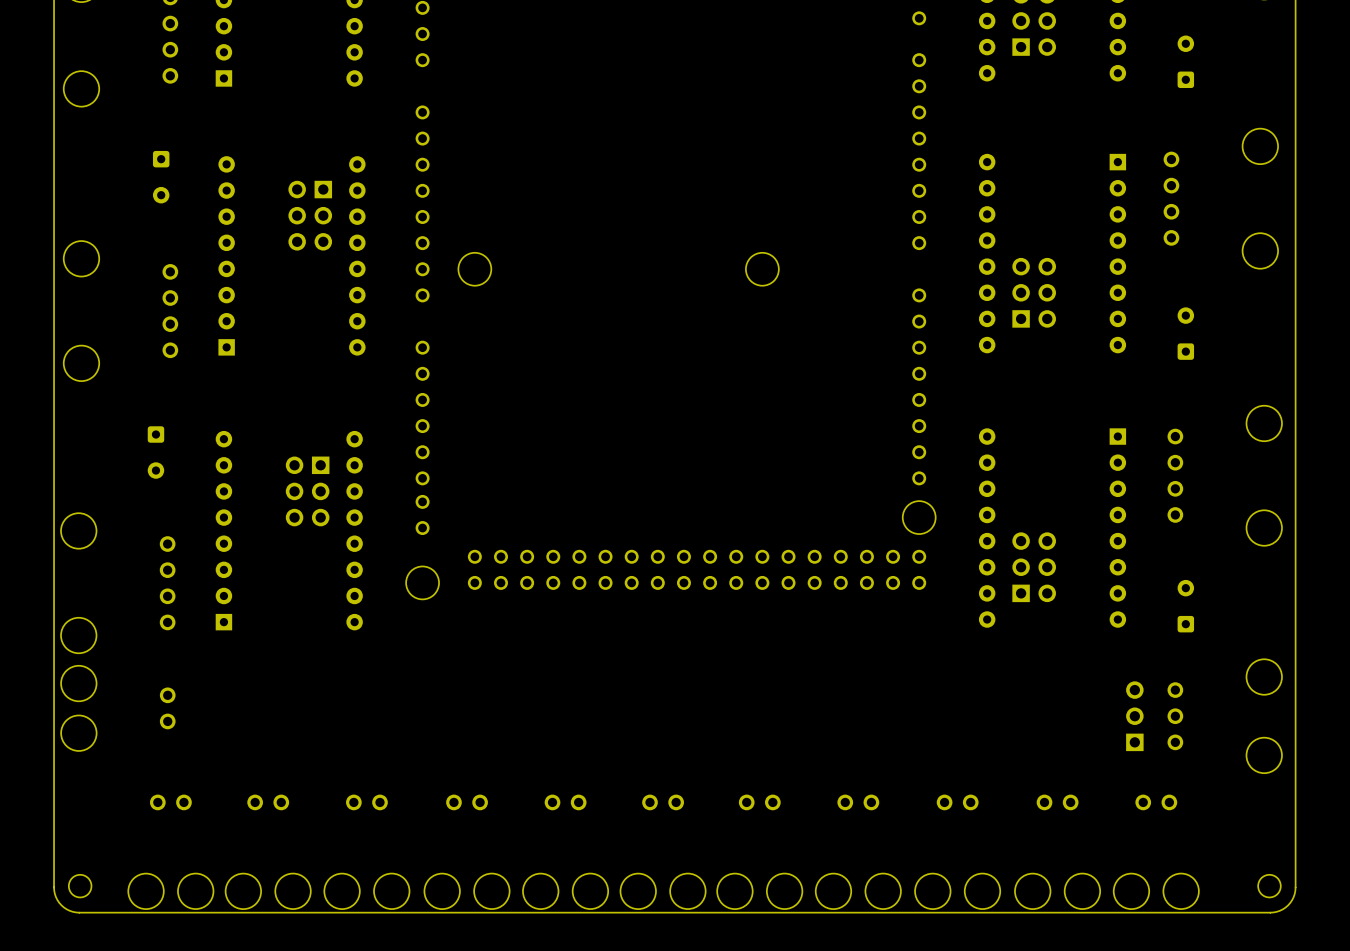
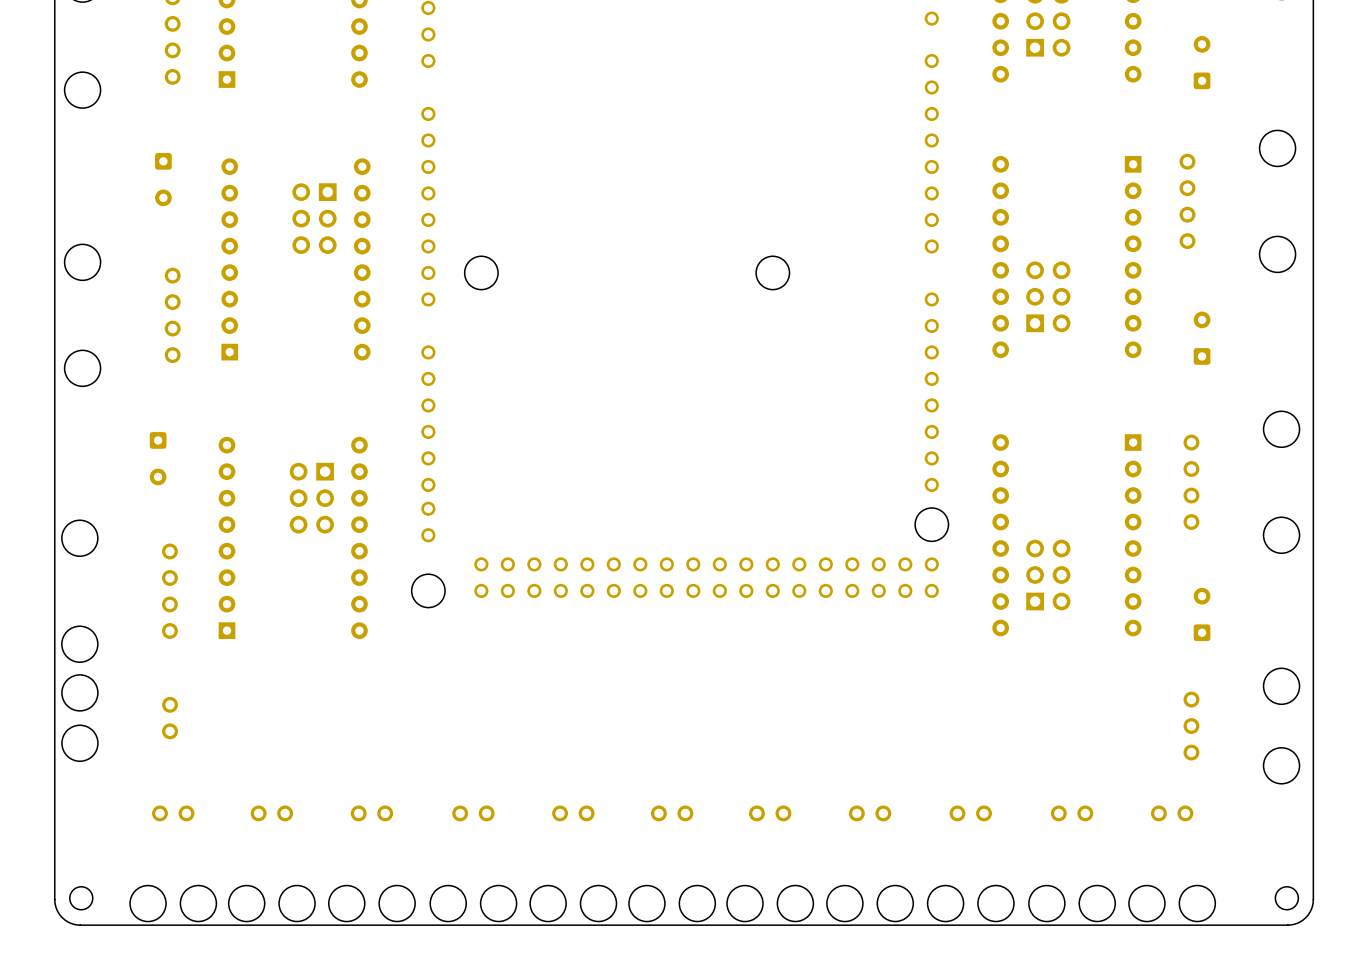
part: (1134, 716) -> none

